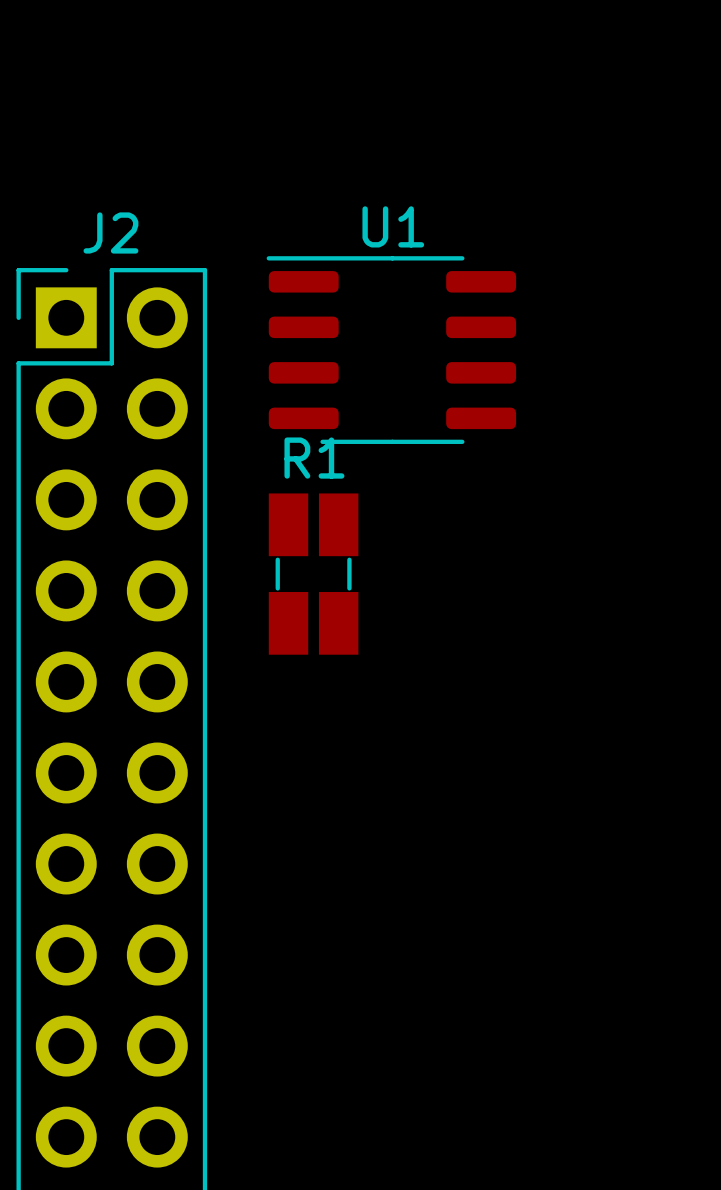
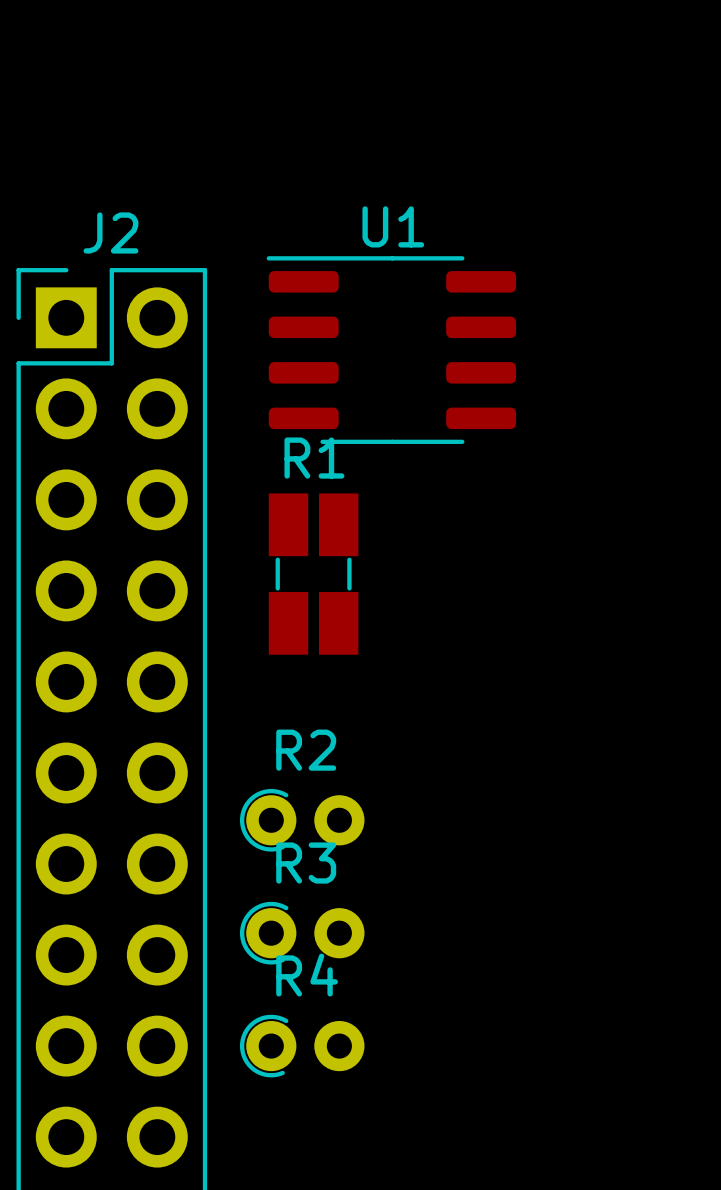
R2: none -> (302, 820)
R3: none -> (302, 933)
R4: none -> (302, 1046)

